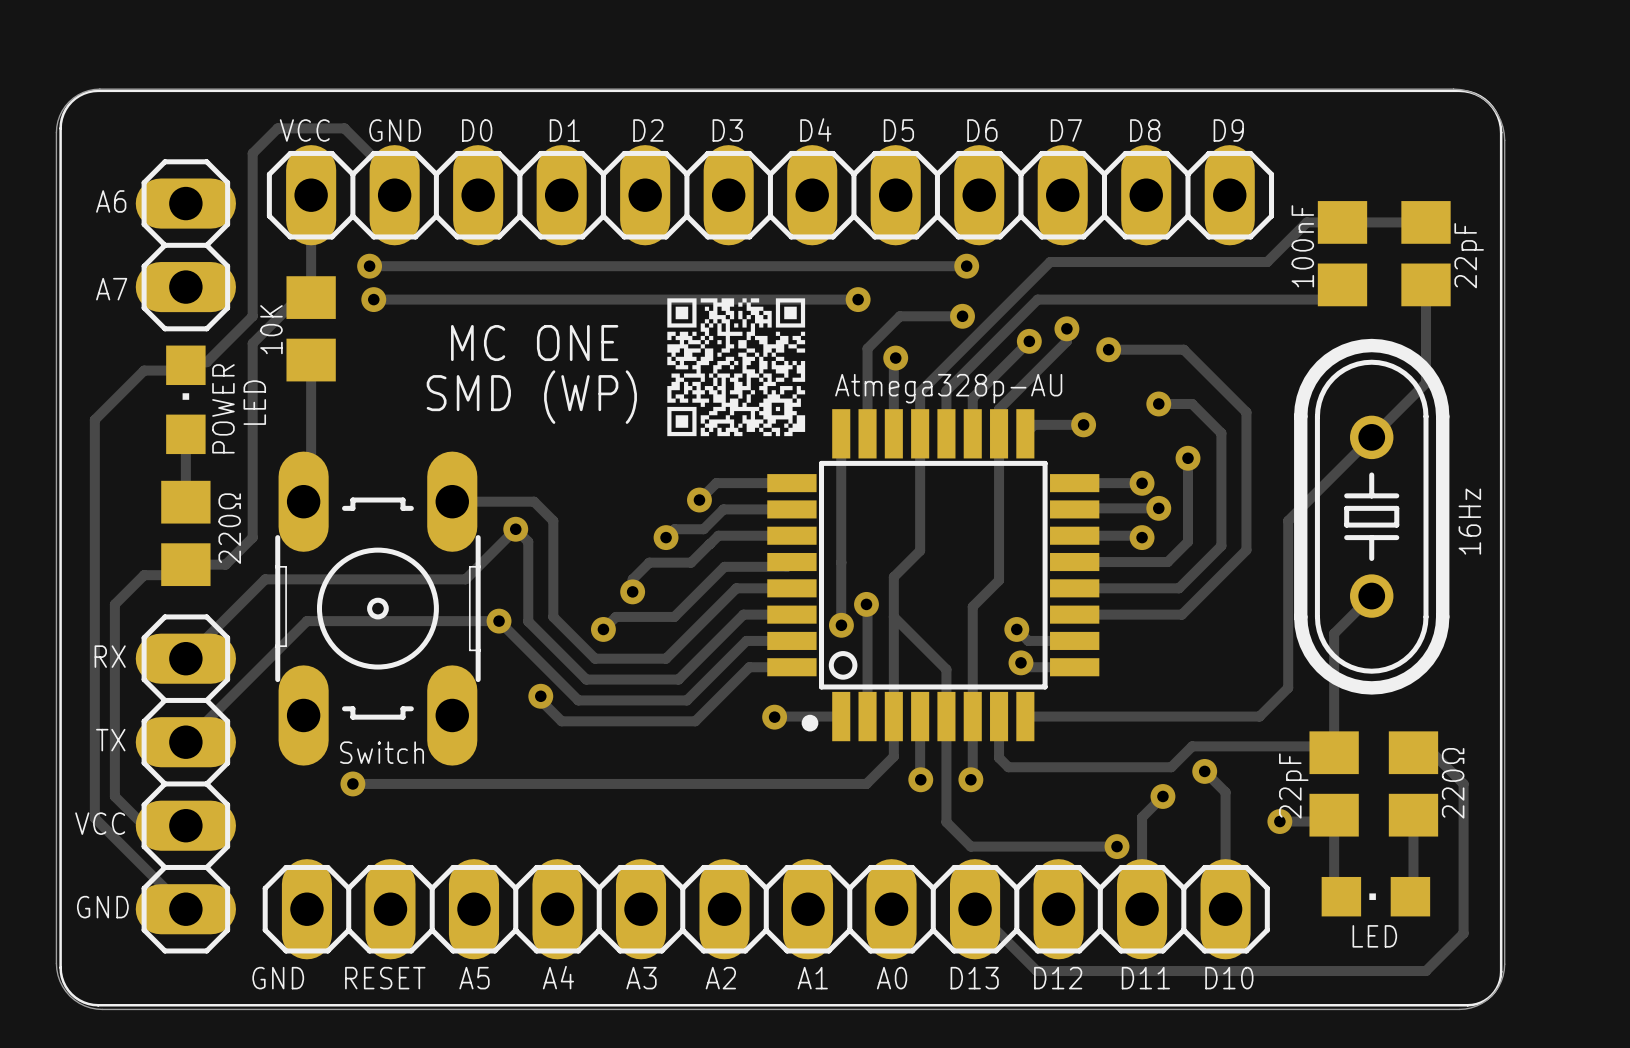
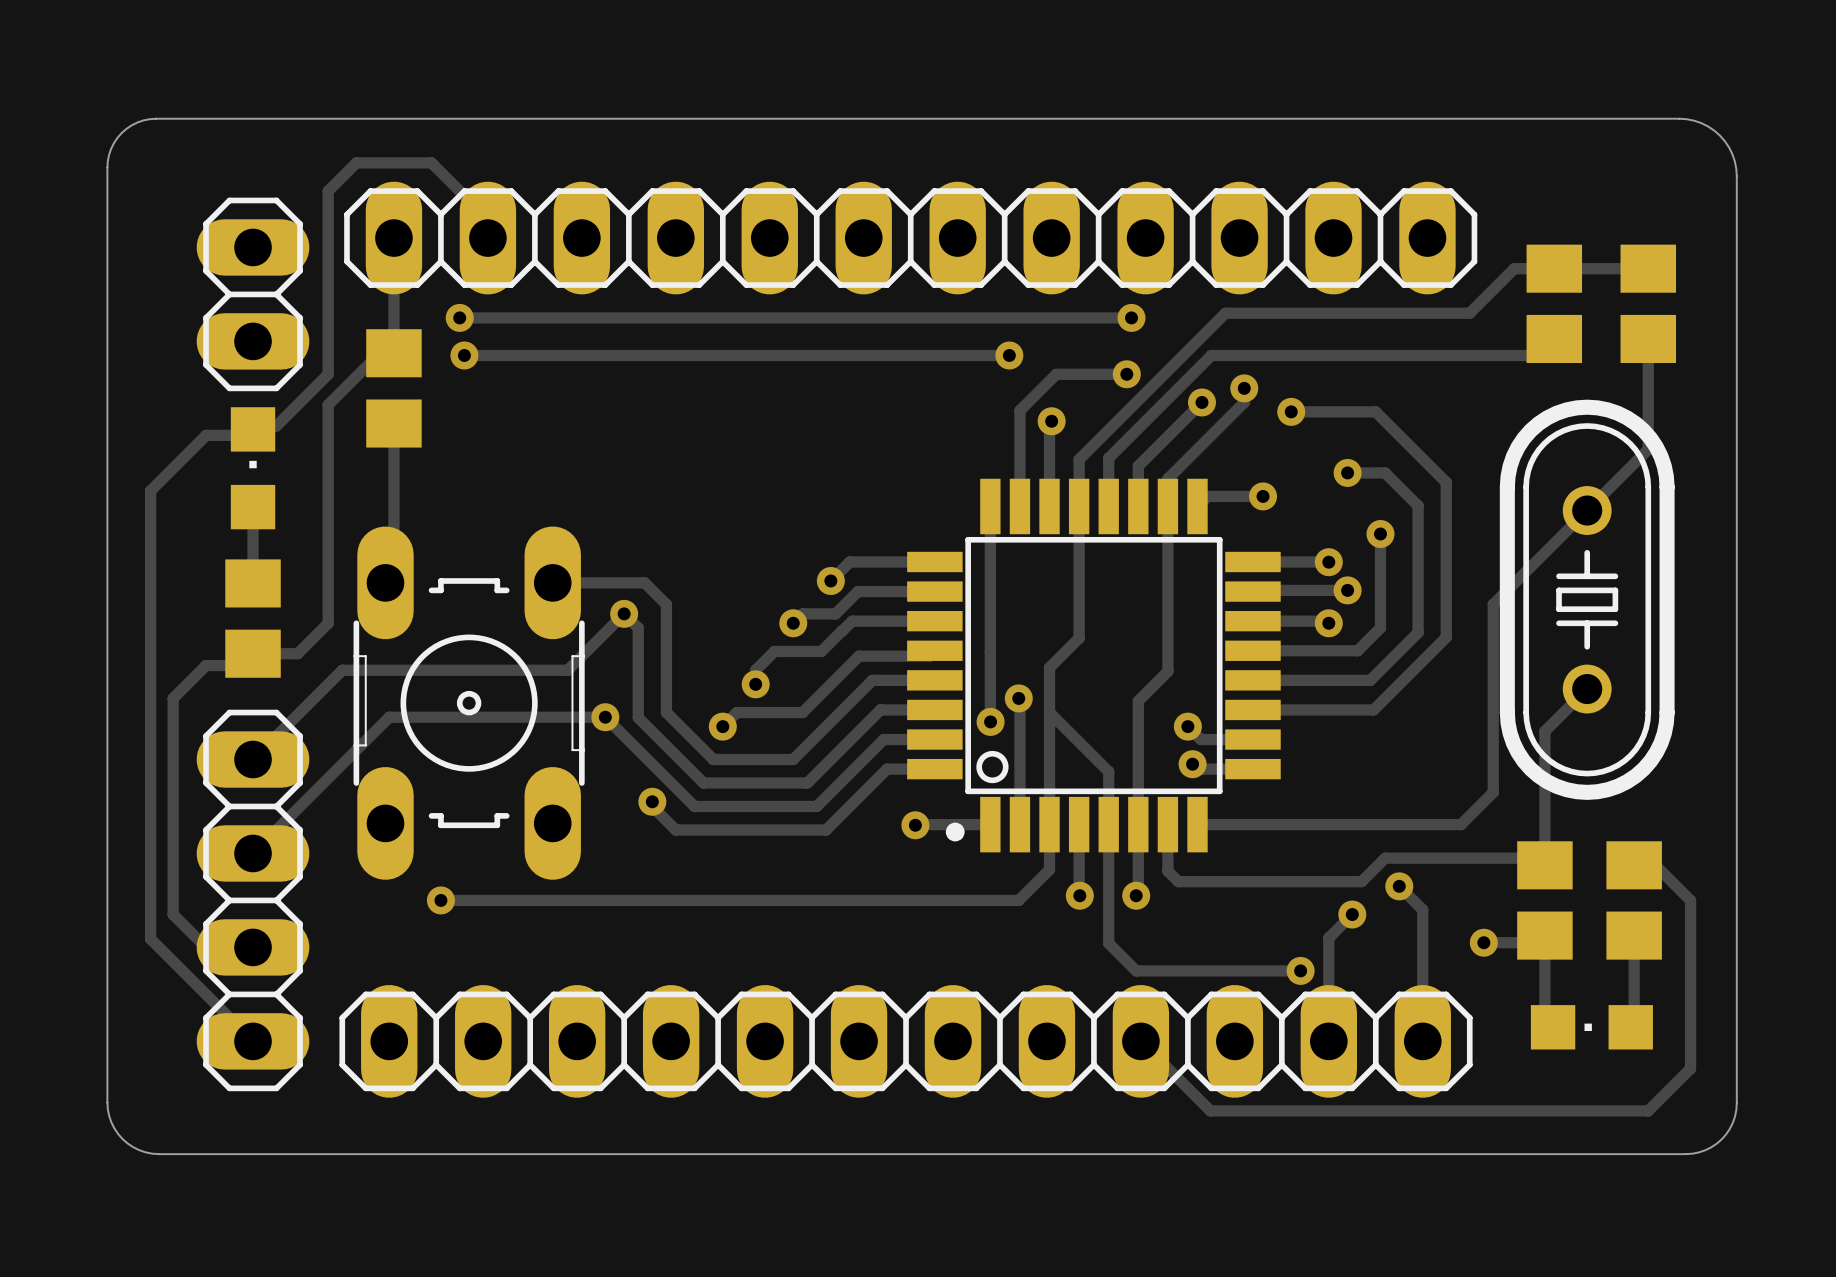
line: (98, 90) (1459, 90) (1480, 96) (1495, 111) (1501, 132) (1501, 971) (1496, 988) (1484, 1000) (1467, 1005) (98, 1005) (79, 1000) (65, 986) (60, 967) (60, 128) (63, 114) (71, 101) (83, 93) (98, 90) -> none
text: D4 (815, 129) -> none
text: VCC (304, 130) -> none
text: GND (395, 130) -> none
text: D0 (477, 130) -> none
text: D1 (564, 130) -> none
text: D2 (648, 130) -> none
text: D3 (727, 130) -> none
text: D5 (898, 130) -> none
text: D6 (982, 130) -> none
text: D7 (1066, 130) -> none
text: D8 (1145, 130) -> none
text: D9 (1228, 130) -> none
text: A6 (111, 201) -> none
text: 100nF (1302, 246) -> none
text: 22pF (1469, 255) -> none
text: A7 (111, 289) -> none
drawing: [667, 298, 806, 437] -> none
text: 10K (271, 329) -> none
text: MC ONE (534, 343) -> none
text: Atmega328p-AU (948, 388) -> none
text: SMD (WP) (531, 397) -> none
text: LED (254, 402) -> none
text: POWER (223, 408) -> none
text: 16Hz (1469, 521) -> none
text: 220Ω (229, 528) -> none
text: RX (110, 656) -> none
text: TX (110, 740) -> none
text: Switch (382, 752) -> none
text: 220Ω (1453, 783) -> none
text: 22pF (1293, 785) -> none
text: VCC (100, 823) -> none
text: GND (102, 907) -> none
text: LED (1374, 936) -> none
text: A4 (558, 977) -> none
text: GND (278, 978) -> none
text: RESET (385, 978) -> none
text: A5 (474, 978) -> none
text: A3 (641, 978) -> none
text: A2 (720, 978) -> none
text: A1 (812, 978) -> none
text: A0 (892, 978) -> none
text: D13 (974, 978) -> none
text: D12 (1058, 978) -> none
text: D11 (1145, 978) -> none
text: D10 (1229, 978) -> none

